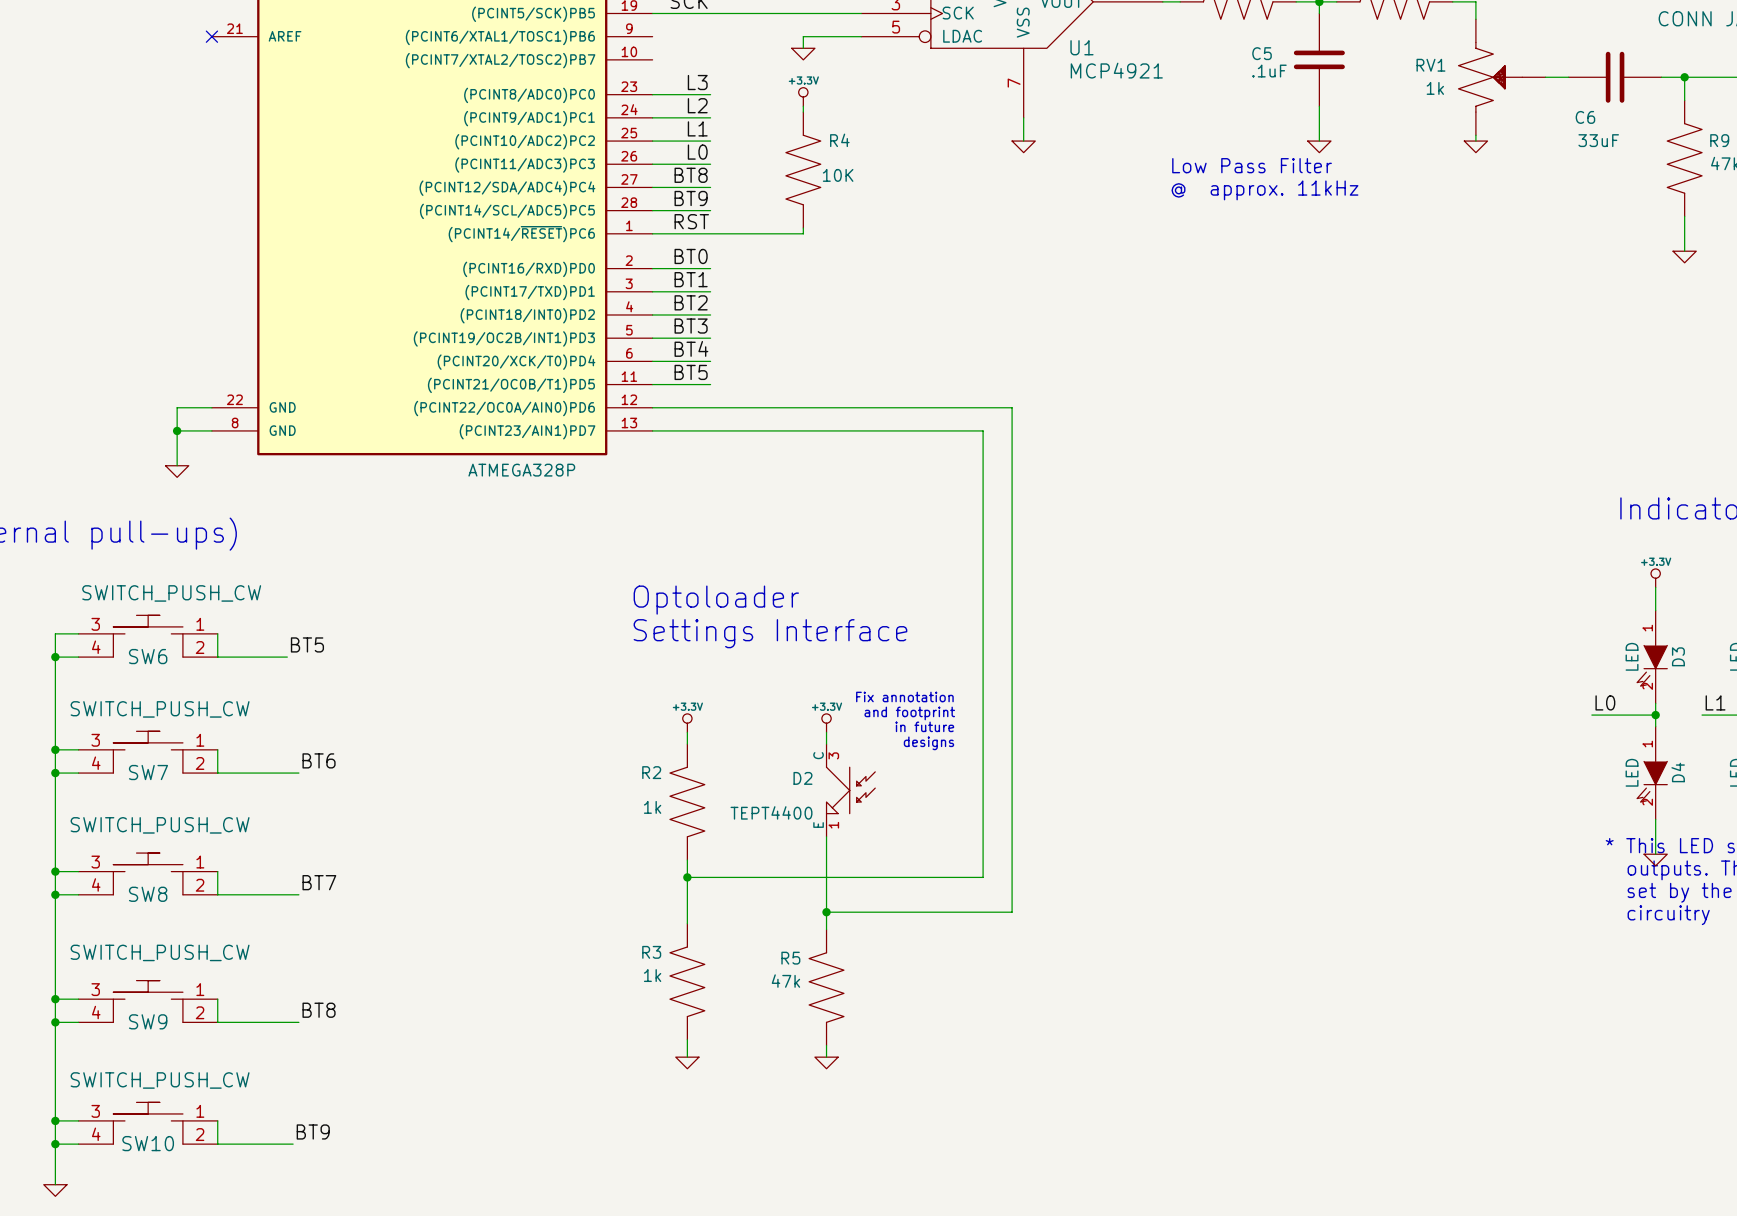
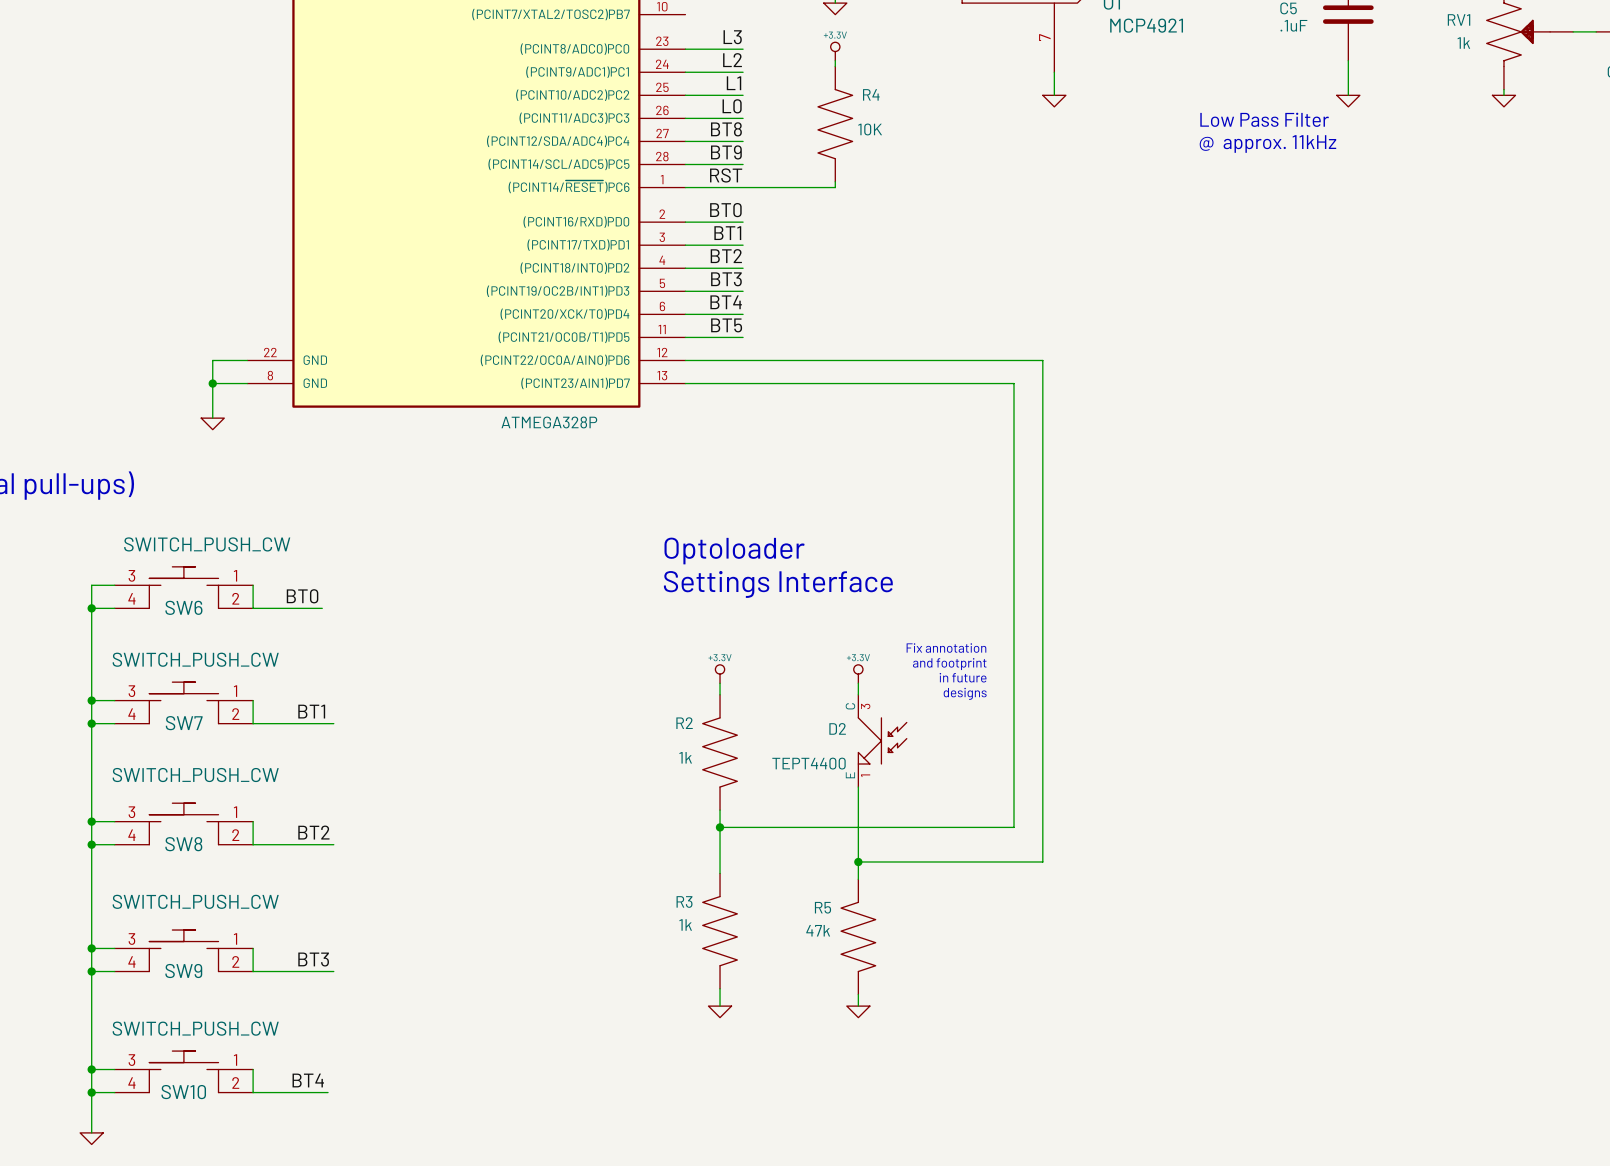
label: BT5 (307, 644) -> BT0 (302, 596)
label: BT6 (319, 760) -> BT1 (311, 711)
label: BT7 (319, 882) -> BT2 (313, 832)
label: BT8 (319, 1010) -> BT3 (313, 959)
label: BT9 (313, 1131) -> BT4 (308, 1080)

